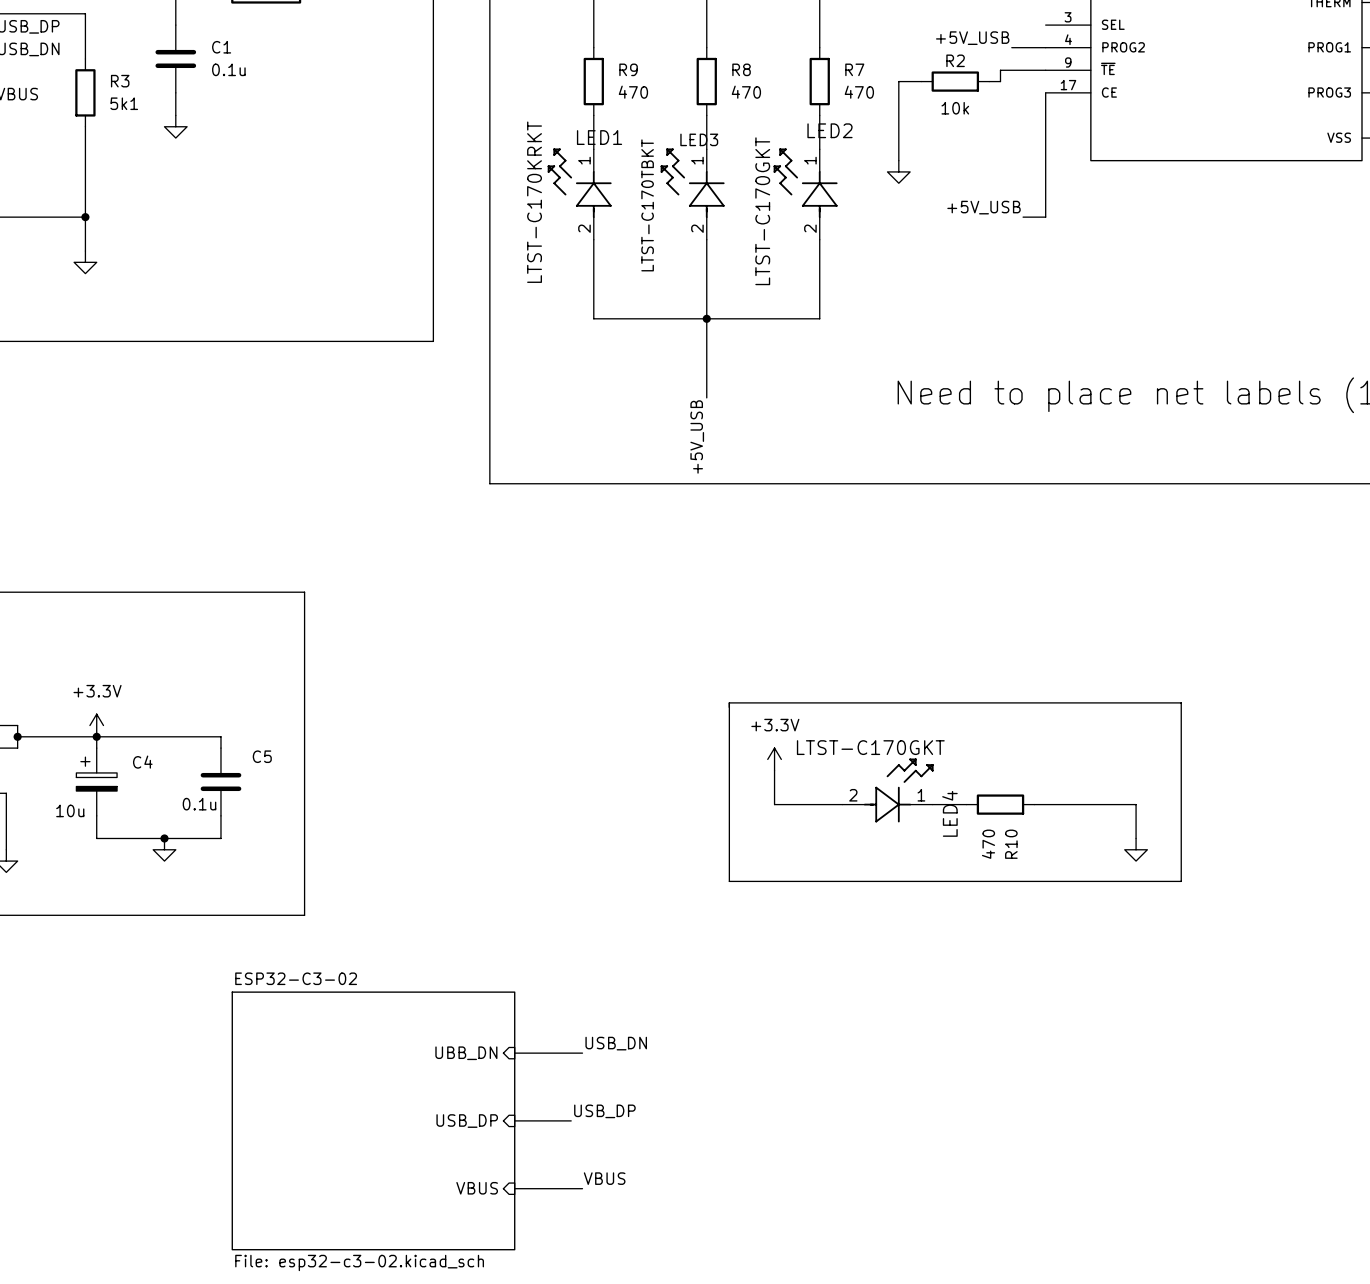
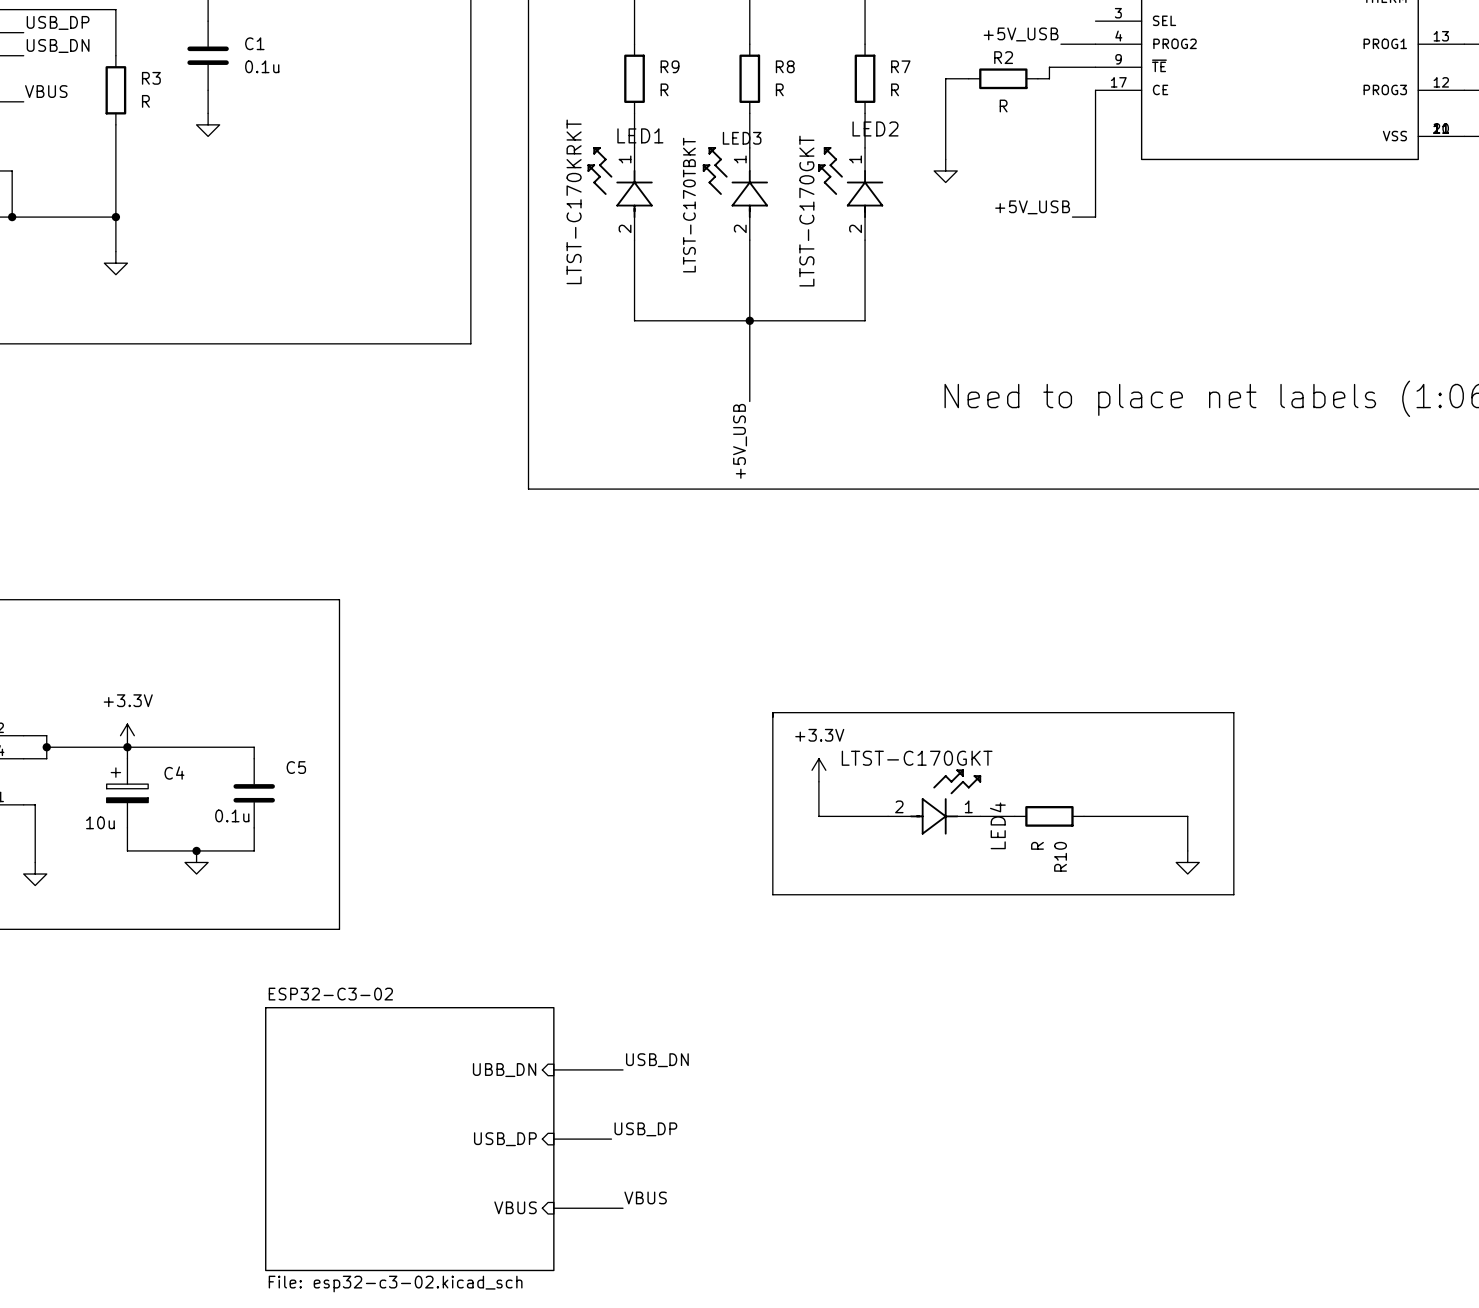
R9 value: 470 (633, 92) -> R (664, 89)
R8 value: 470 (746, 92) -> R (779, 89)
R7 value: 470 (859, 92) -> R (895, 89)
R3 value: 5k1 (124, 103) -> R (145, 101)
R2 value: 10k (955, 108) -> R (1003, 106)
R10 value: 470 (988, 844) -> R (1037, 845)

